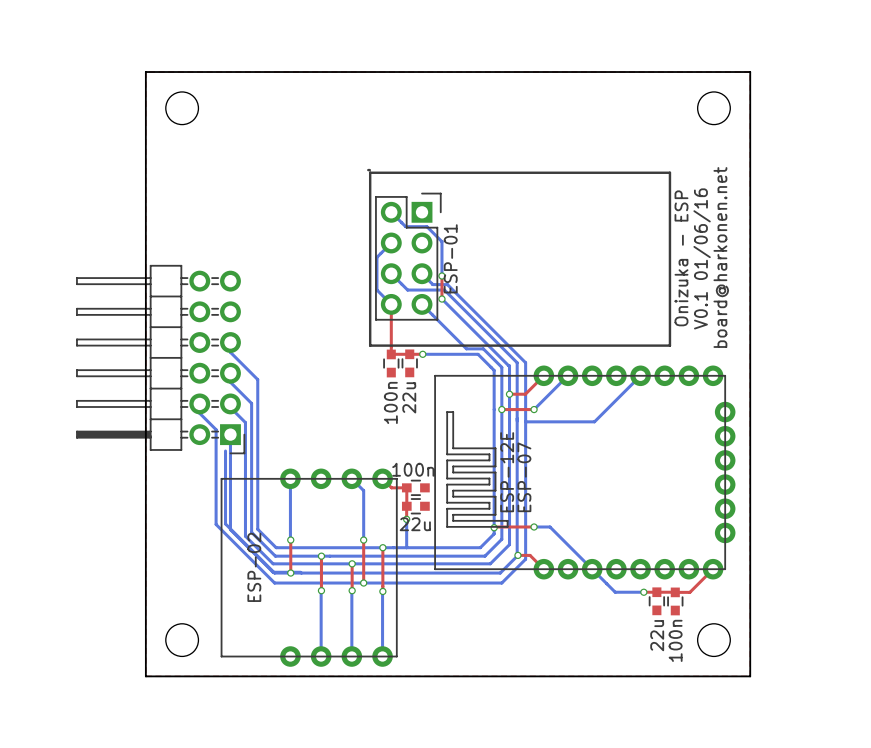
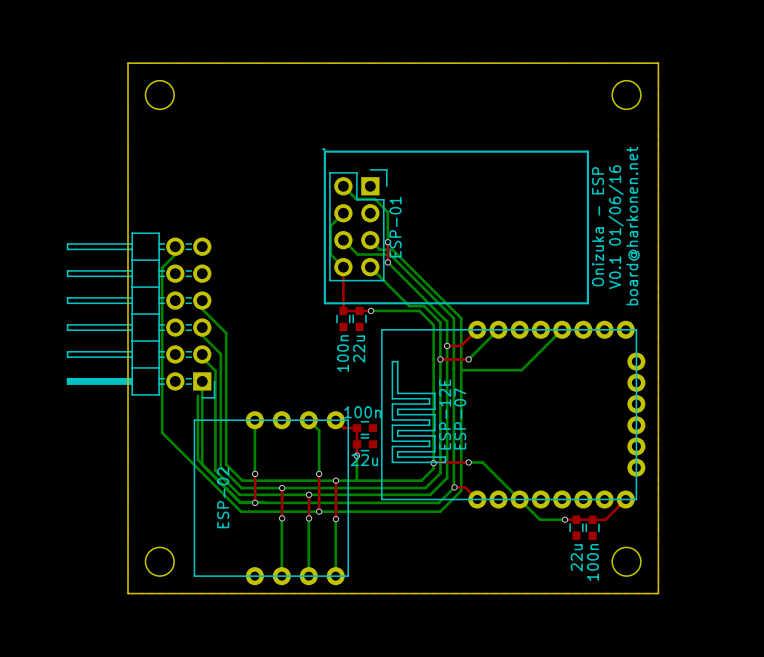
bottom track: (199, 403) (199, 413) (216, 429) (216, 524) -> (175, 246) (175, 254) (162, 267) (162, 432) (189, 460)

